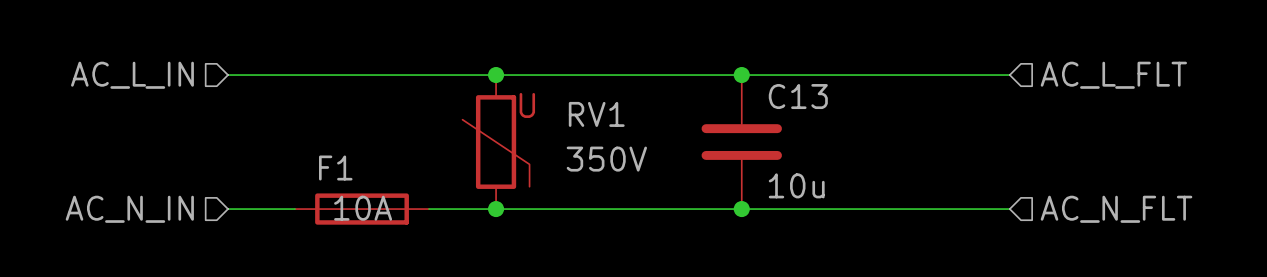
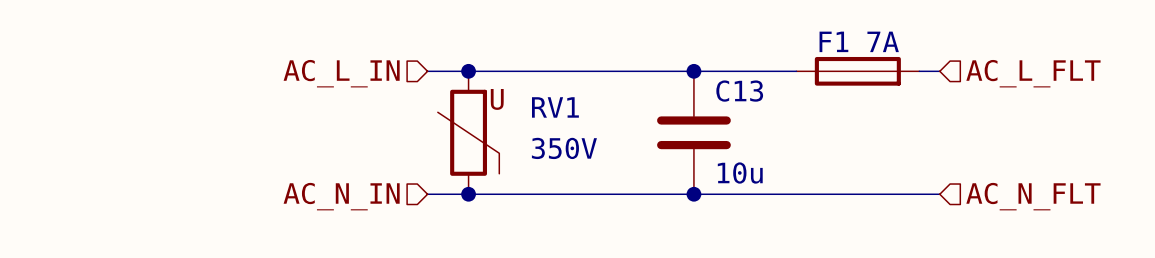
hierarchical label position: AC_L_IN (132, 75) -> AC_L_IN (341, 73)
wire: (228, 75) (451, 75) -> none
F1 name position: F1 (335, 168) -> F1 (833, 41)
F1 value: 10A (363, 208) -> 7A (883, 41)
hierarchical label position: AC_N_IN (129, 209) -> AC_N_IN (341, 196)
wire: (228, 209) (295, 209) -> none
F1 position: (362, 209) -> (857, 71)
wire: (429, 209) (451, 209) -> none

